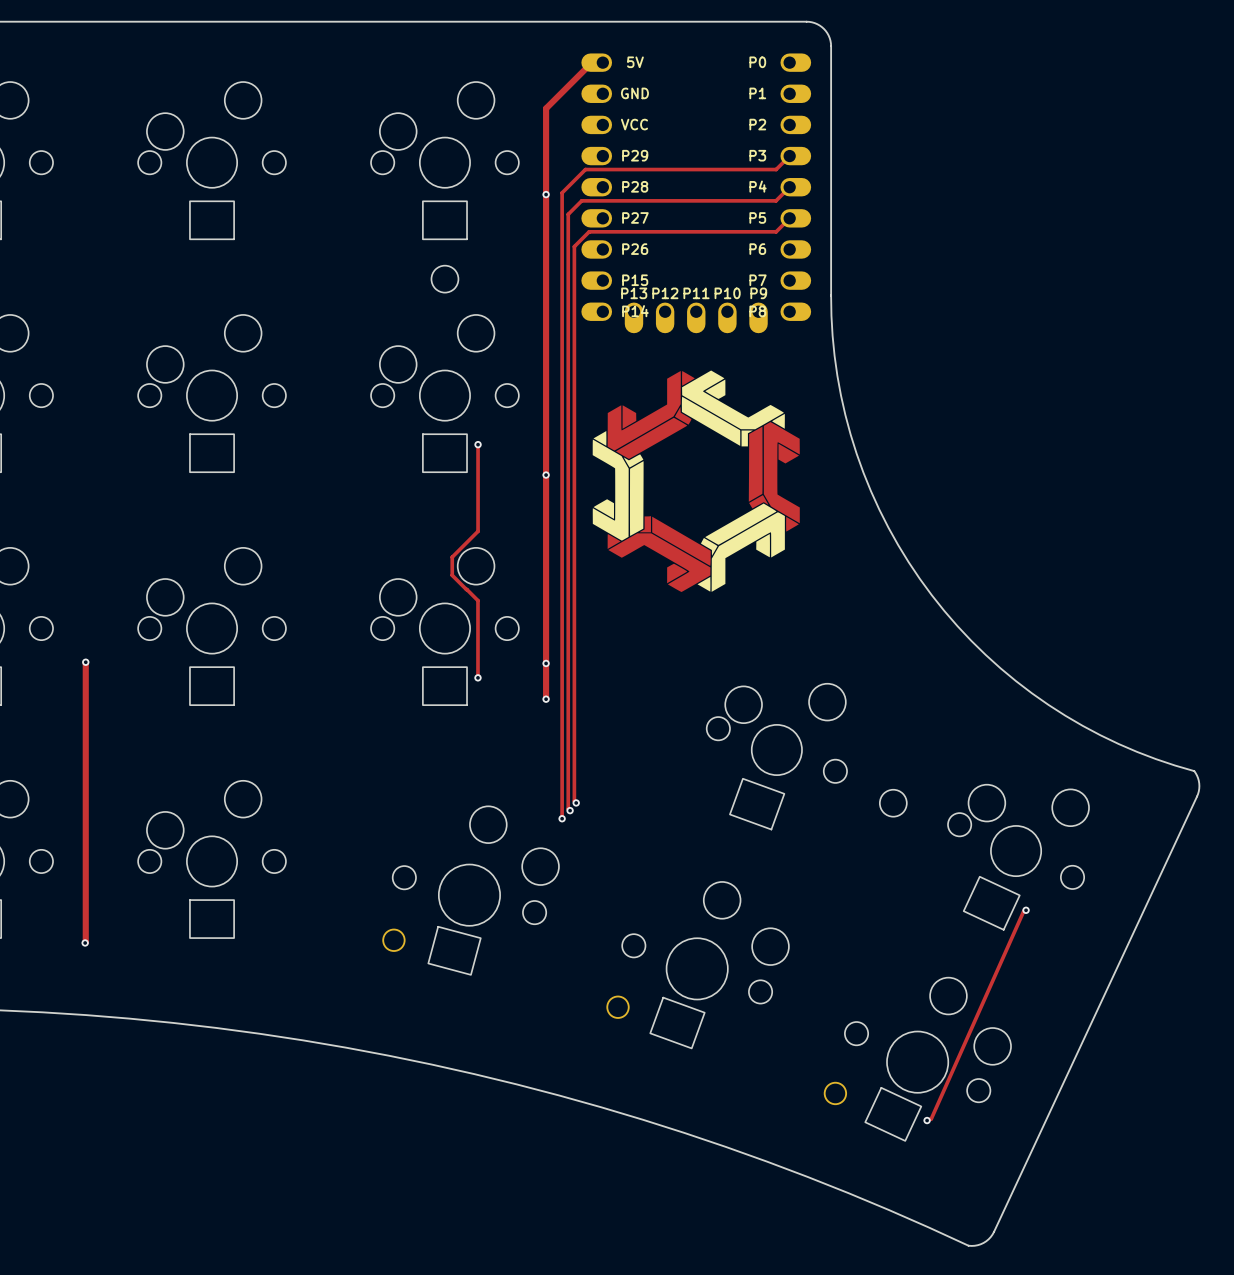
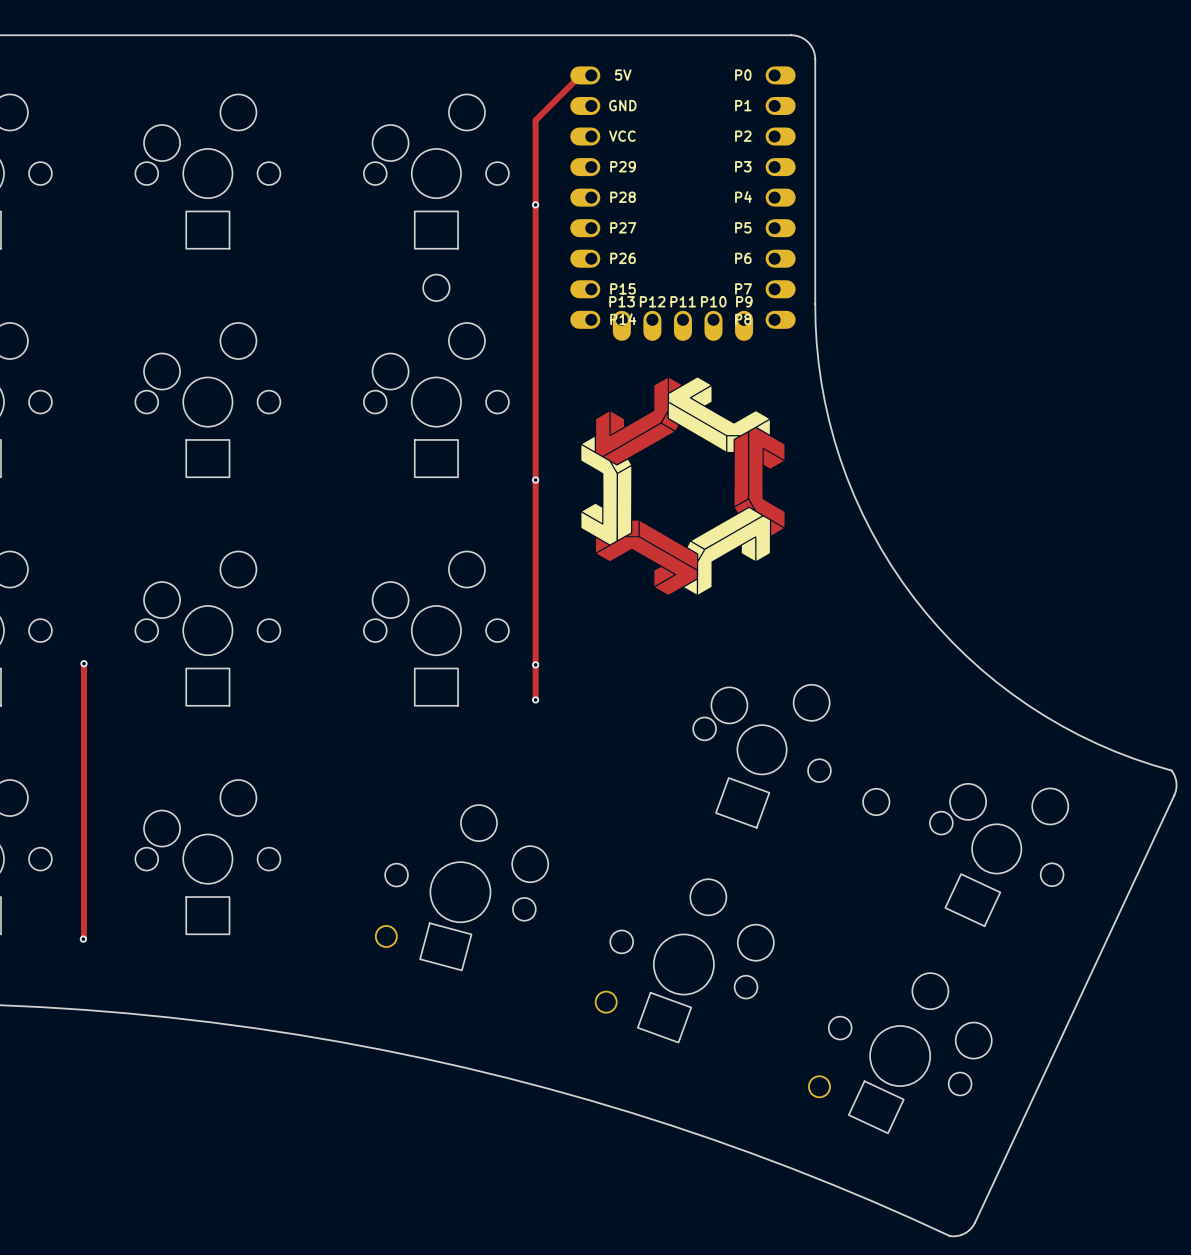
track: (789, 156) (776, 169) (585, 169) (562, 192) (562, 818) -> none
track: (789, 187) (776, 200) (581, 200) (568, 214) (568, 808) (570, 810) -> none
track: (789, 218) (776, 231) (589, 231) (574, 246) (574, 801) (576, 802) -> none
track: (478, 444) (478, 531) (452, 557) (452, 575) (477, 600) (477, 677) -> none
via: (478, 444) -> none
via: (477, 677) -> none
via: (576, 802) -> none
via: (570, 810) -> none
via: (562, 818) -> none
track: (1026, 910) (1023, 911) (931, 1118) (927, 1120) -> none
via: (1026, 910) -> none
via: (927, 1120) -> none

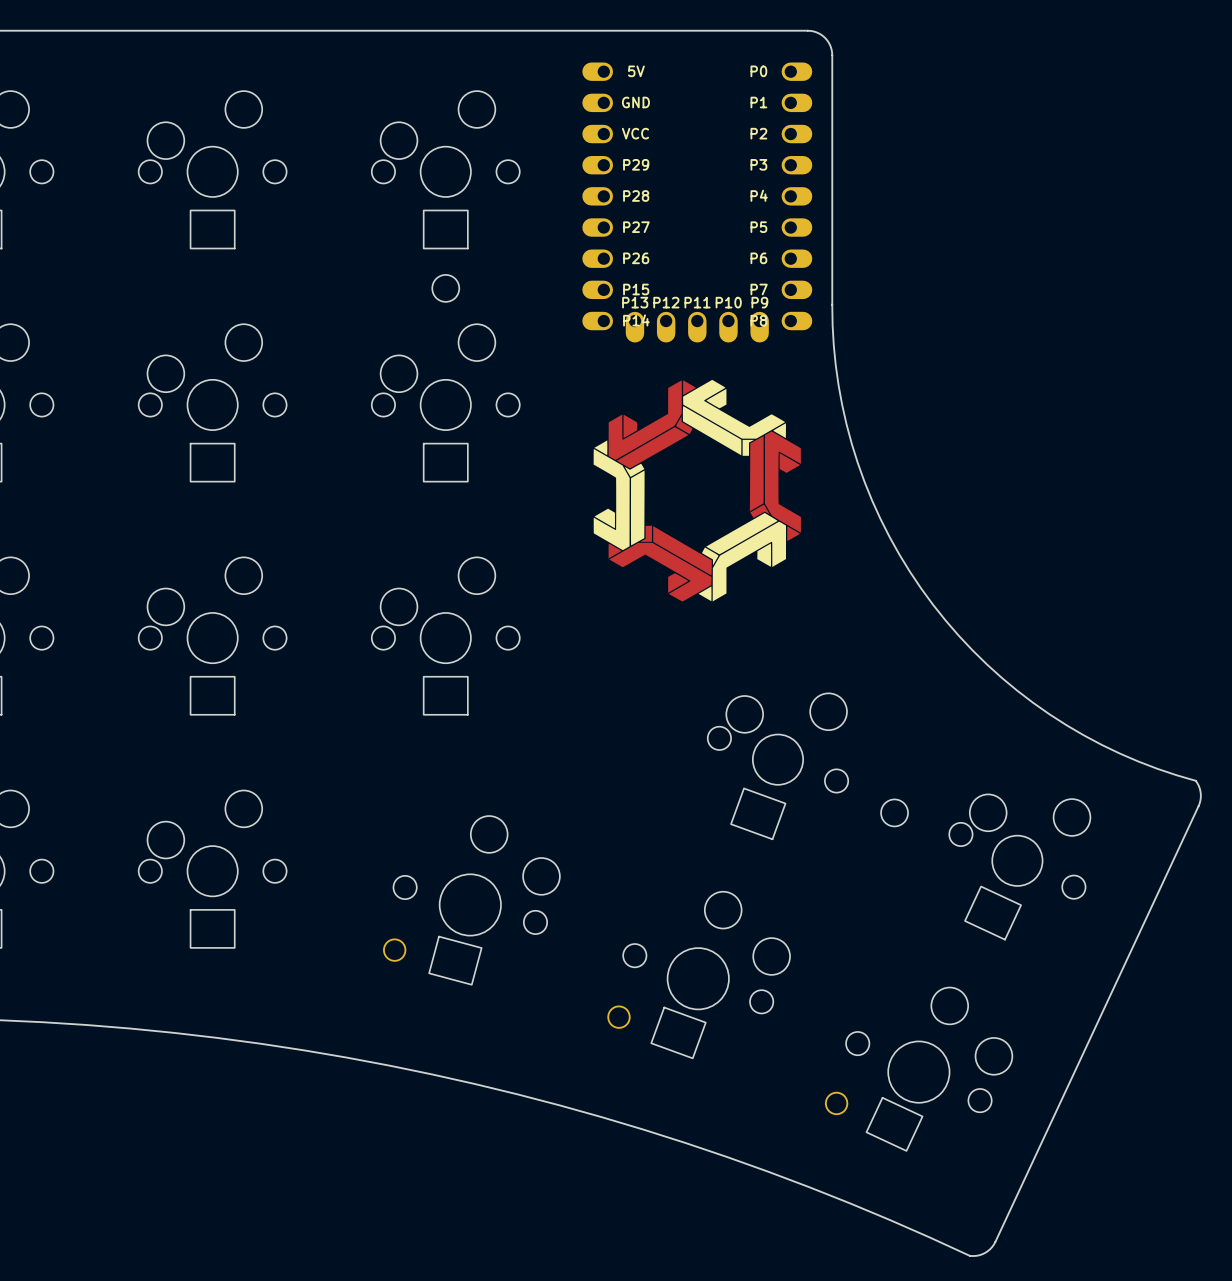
track: (591, 75) (580, 75) (535, 120) (535, 699) -> none
via: (535, 204) -> none
via: (535, 480) -> none
via: (83, 663) -> none
track: (84, 663) (83, 939) -> none
via: (535, 664) -> none
via: (535, 699) -> none
via: (83, 939) -> none

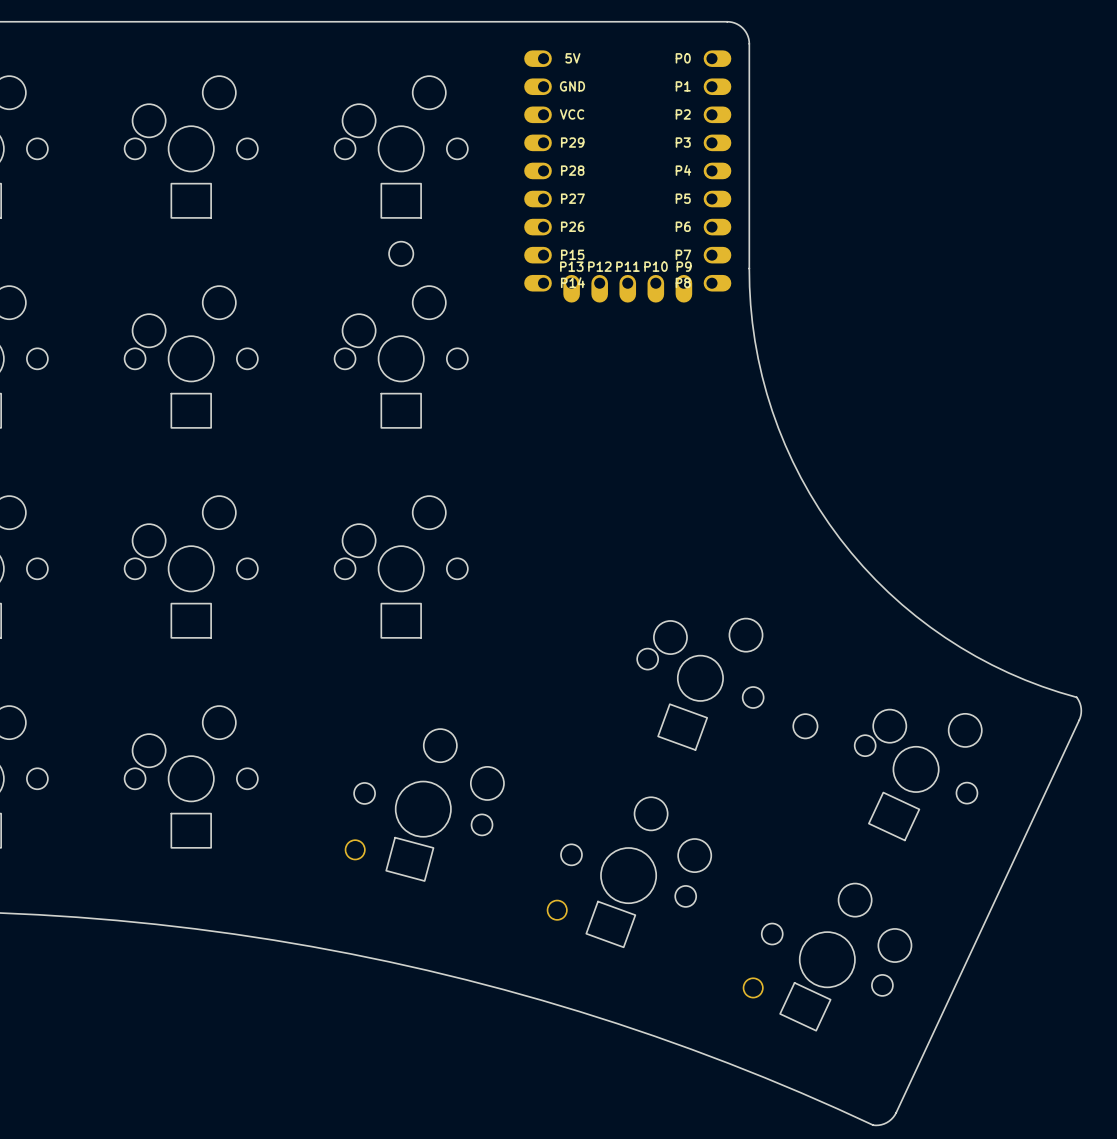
drawing: [593, 379, 801, 602] -> none

